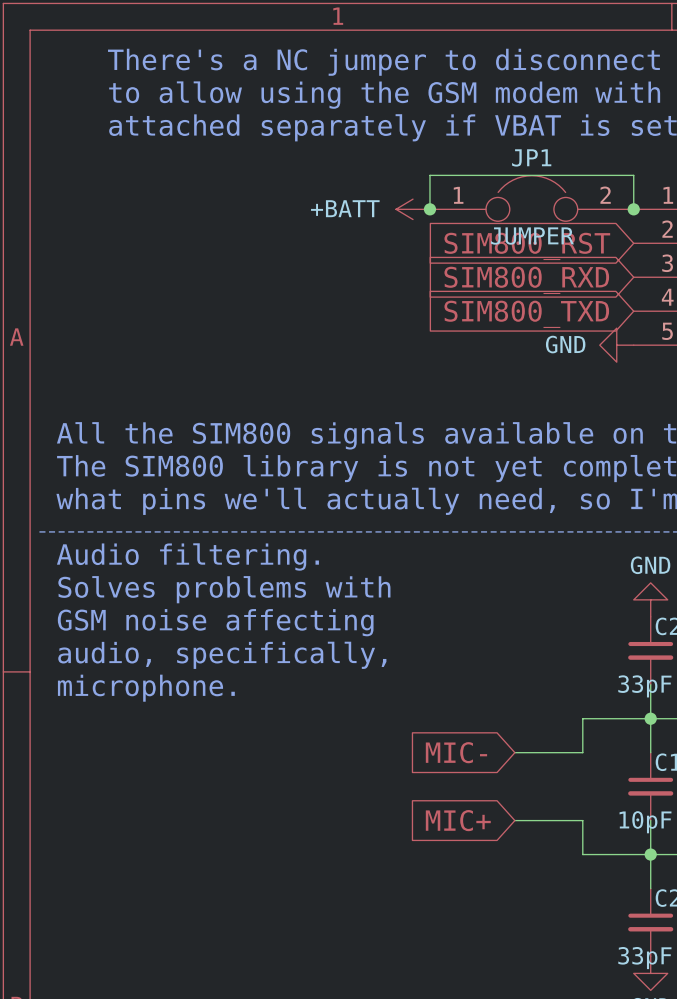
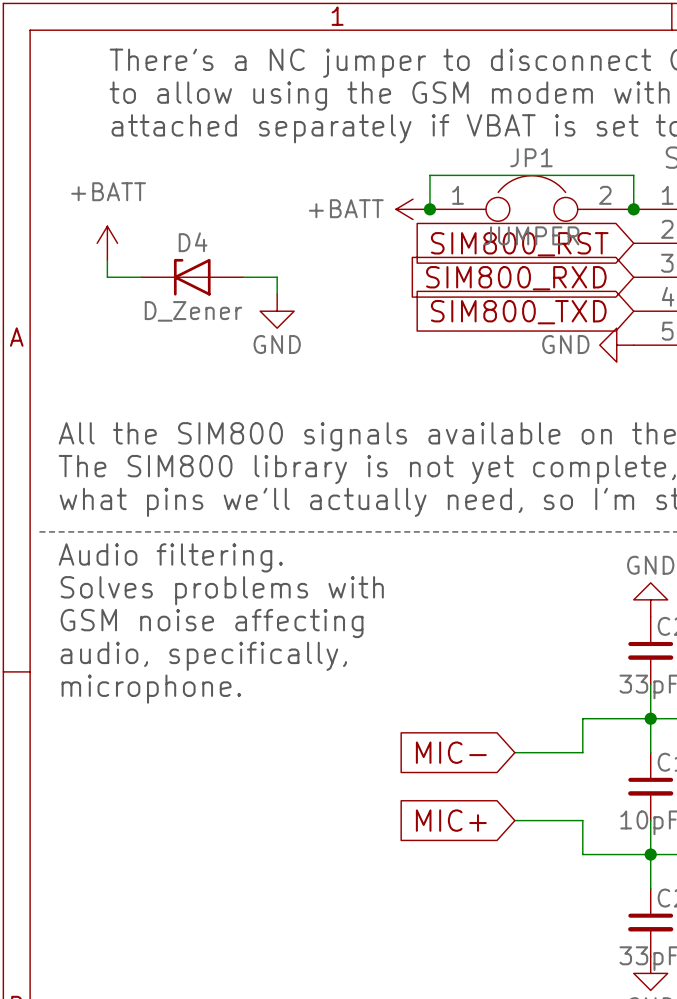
power symbol: none -> +BATT (107, 243)
wire: none -> (107, 260) (107, 277) (141, 277)
D4: none -> D_Zener (192, 277)
wire: none -> (243, 277) (277, 277) (277, 294)
power symbol: none -> GND (277, 311)

